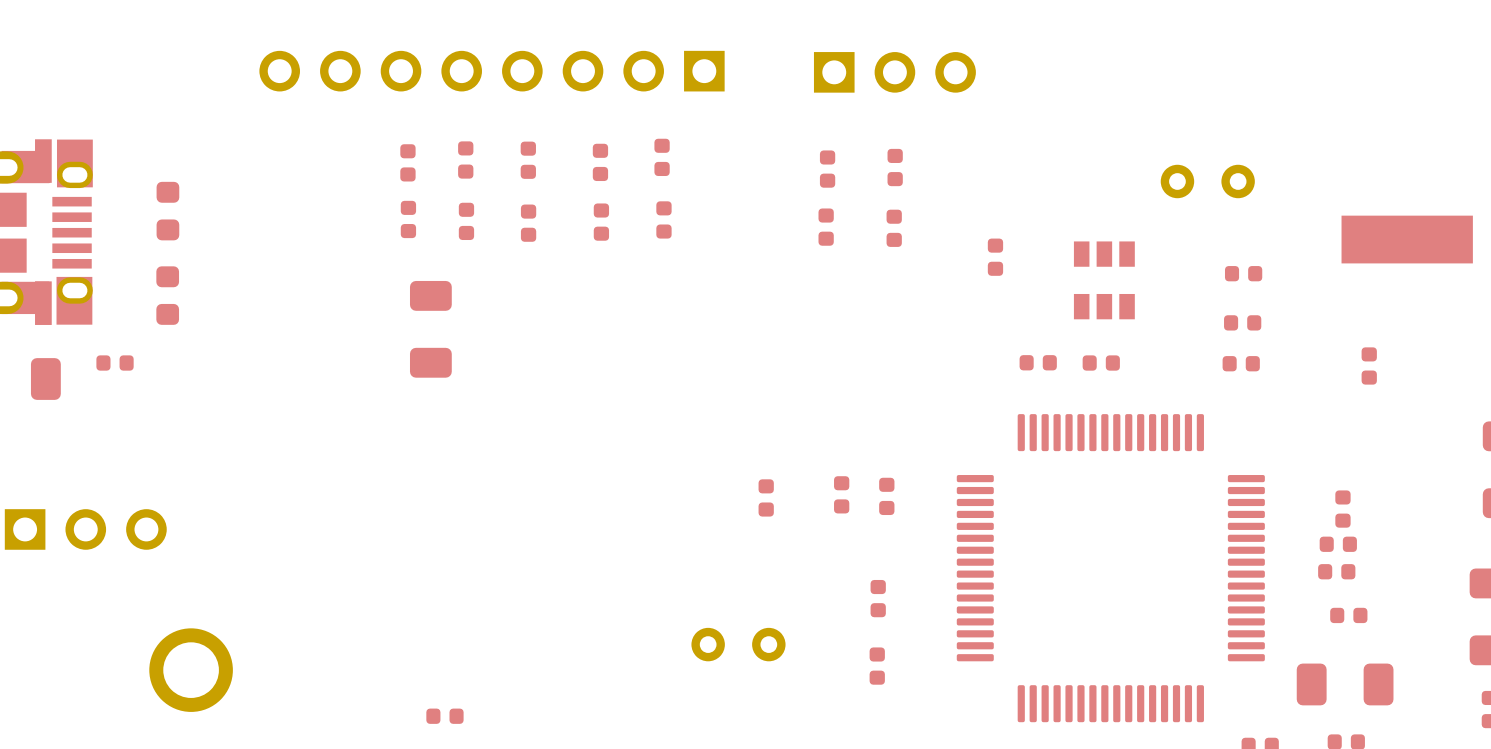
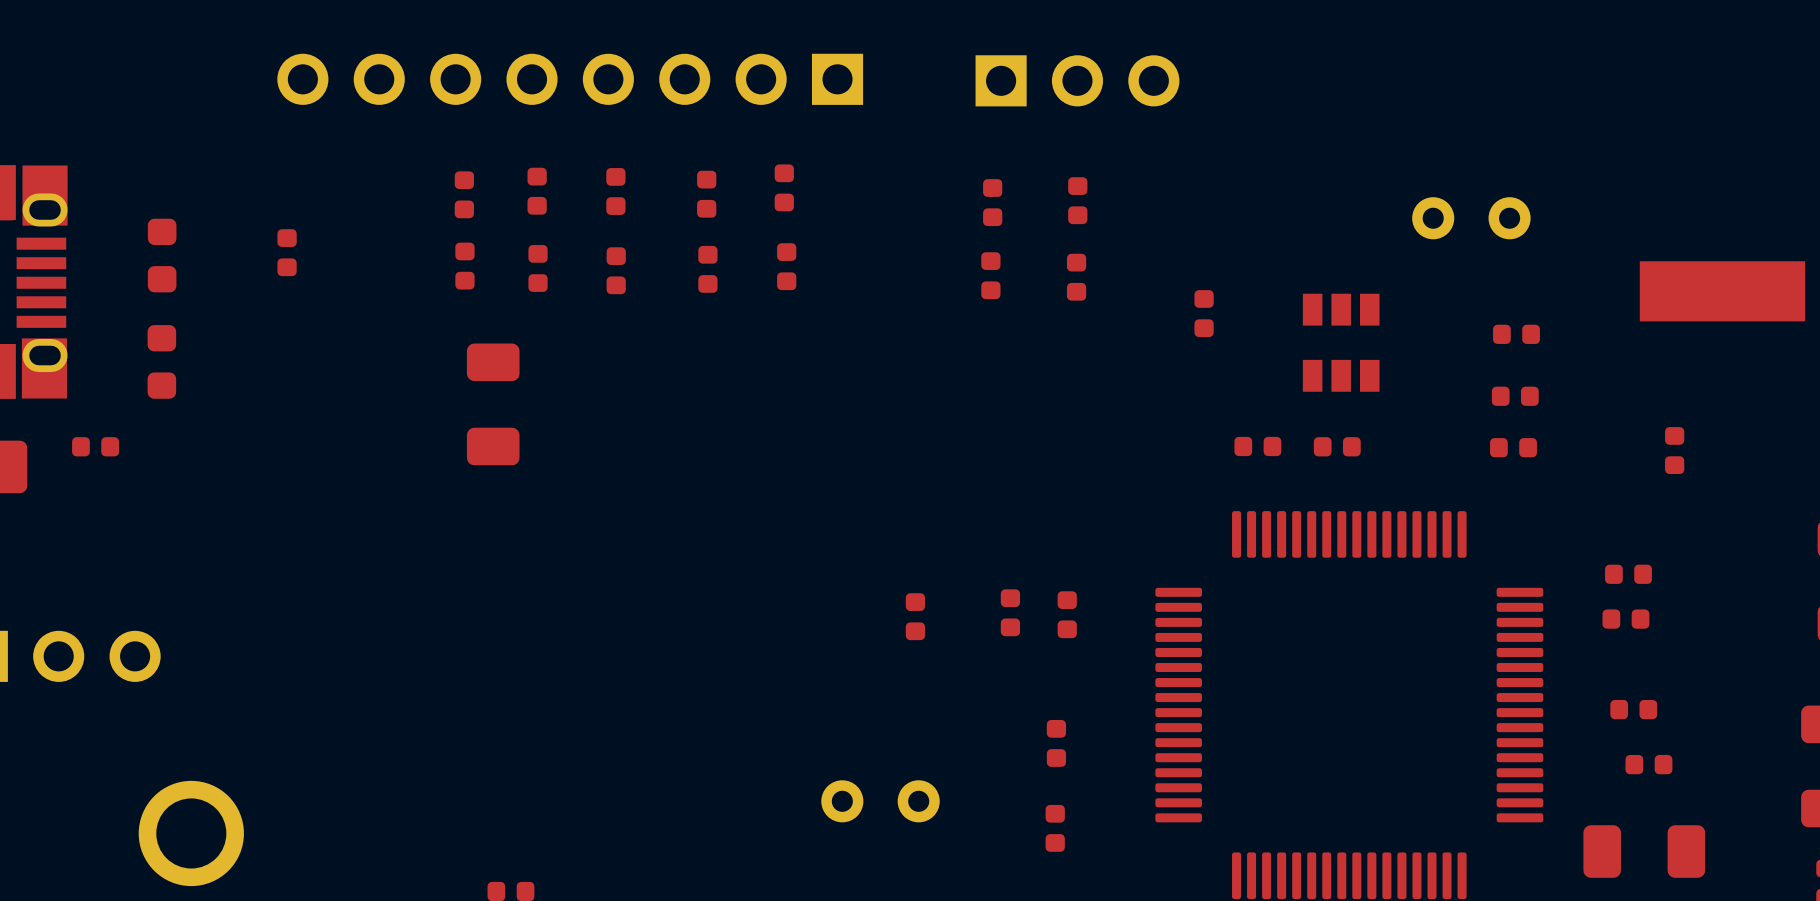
part: none -> (287, 252)
part rotation: 0° (1342, 509) -> 90° clockwise (1625, 619)
part position: (1338, 544) -> (1628, 574)

